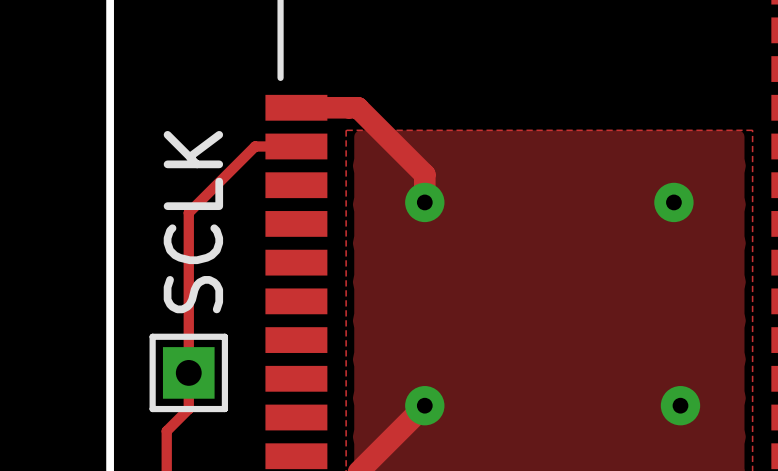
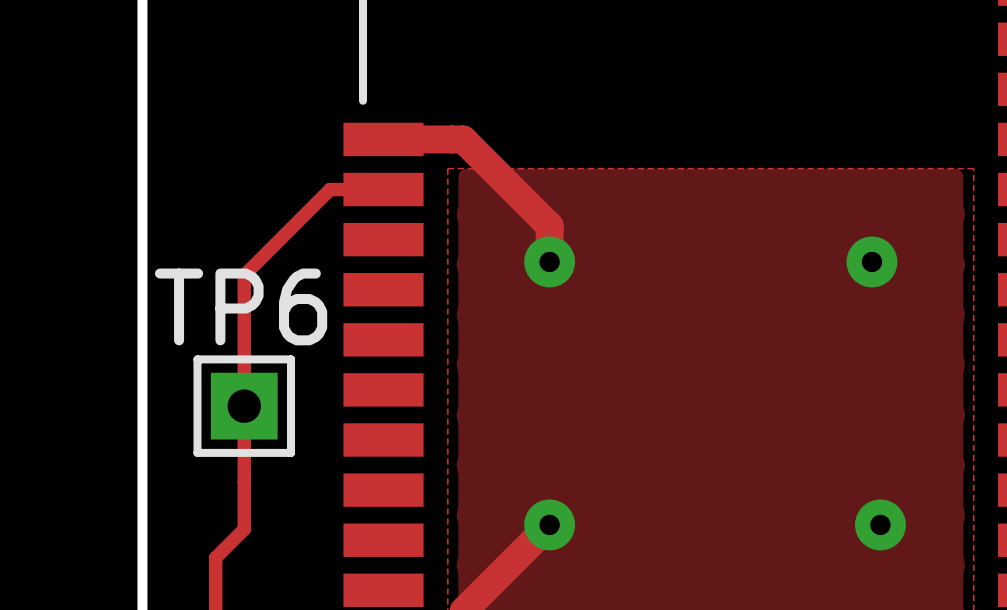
TP6: none -> (244, 406)
SCLK: (188, 372) -> none

